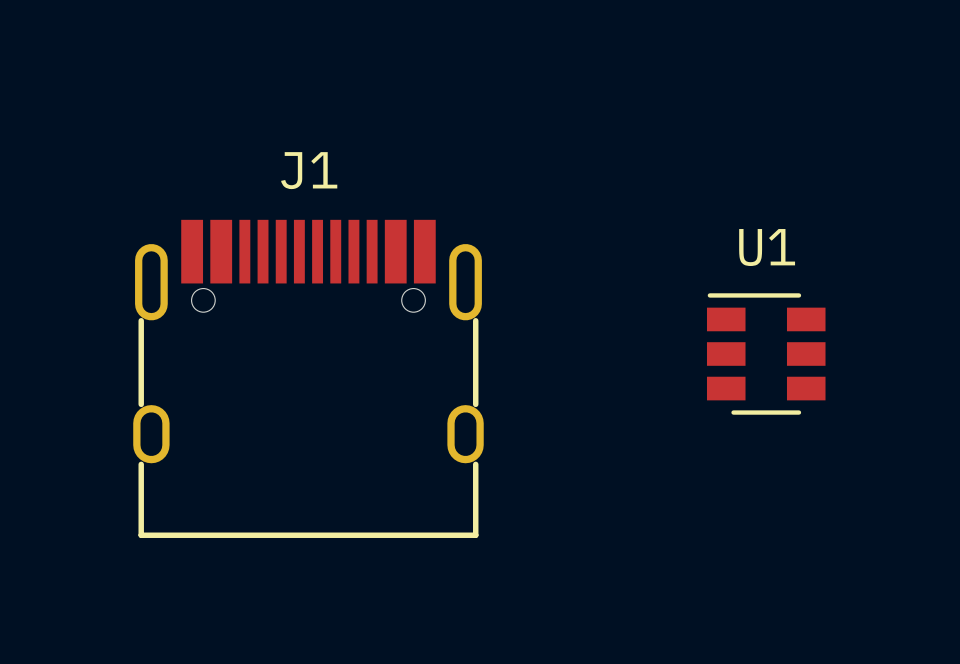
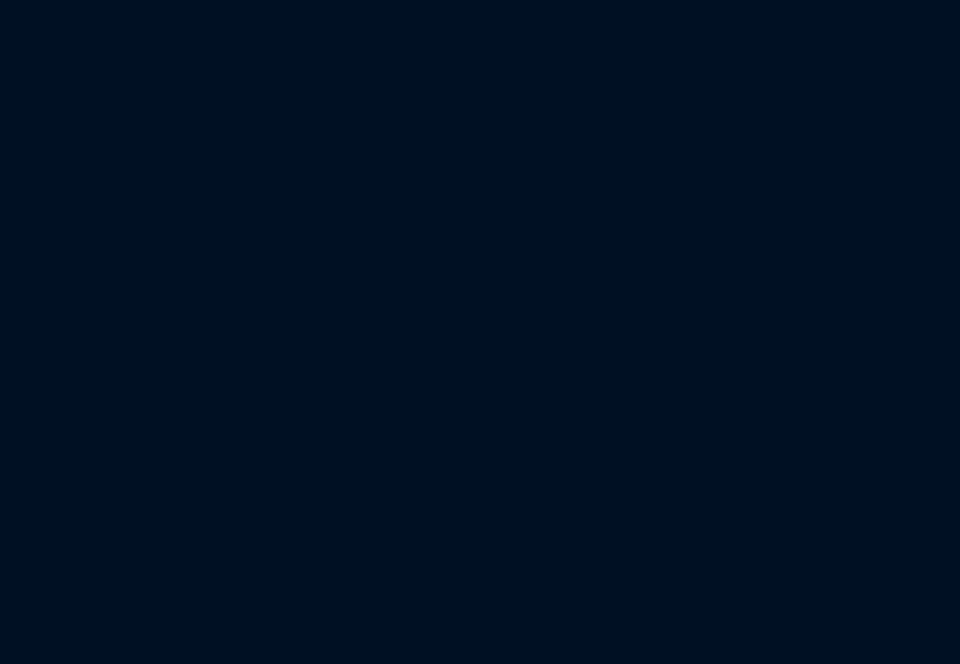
U1: (766, 354) -> none
J1: (308, 378) -> none

